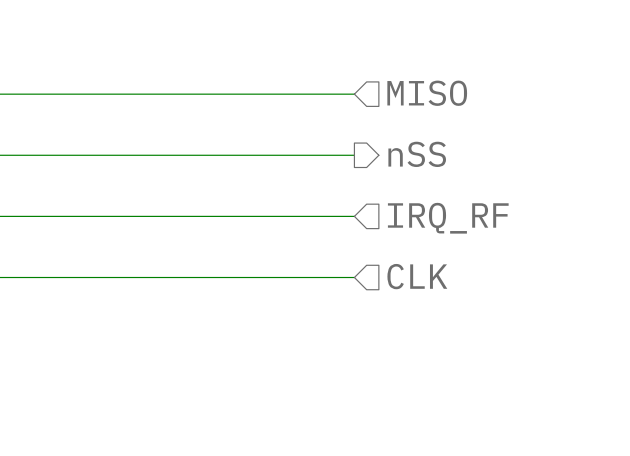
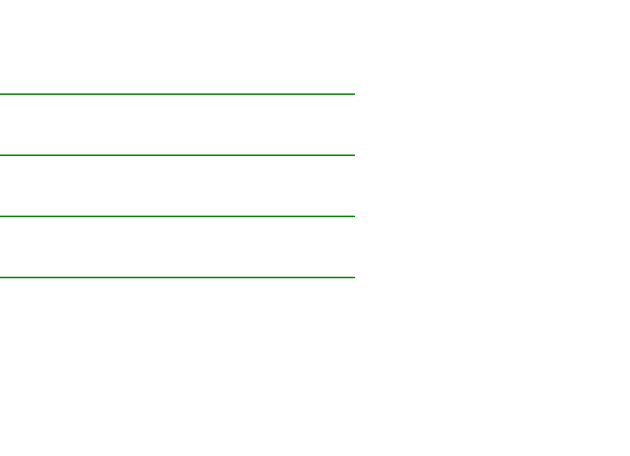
hierarchical label: MISO (427, 93) -> none
hierarchical label: nSS (417, 154) -> none
hierarchical label: IRQ_RF (448, 218) -> none
hierarchical label: CLK (417, 276) -> none

